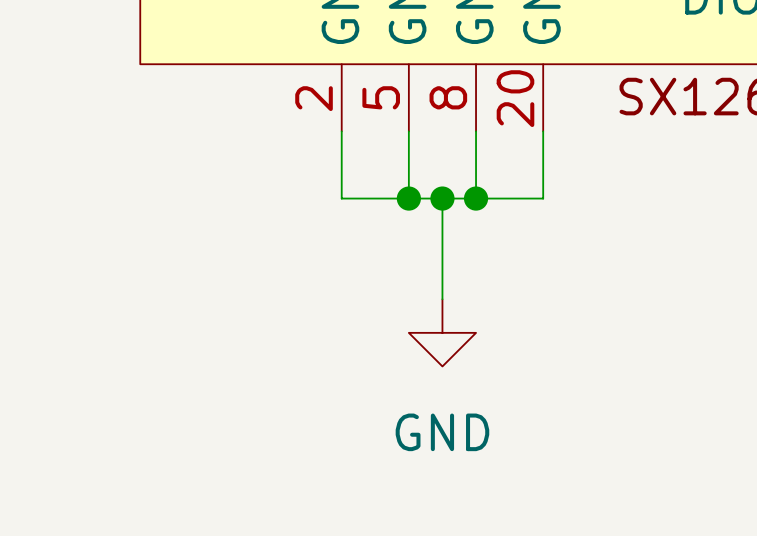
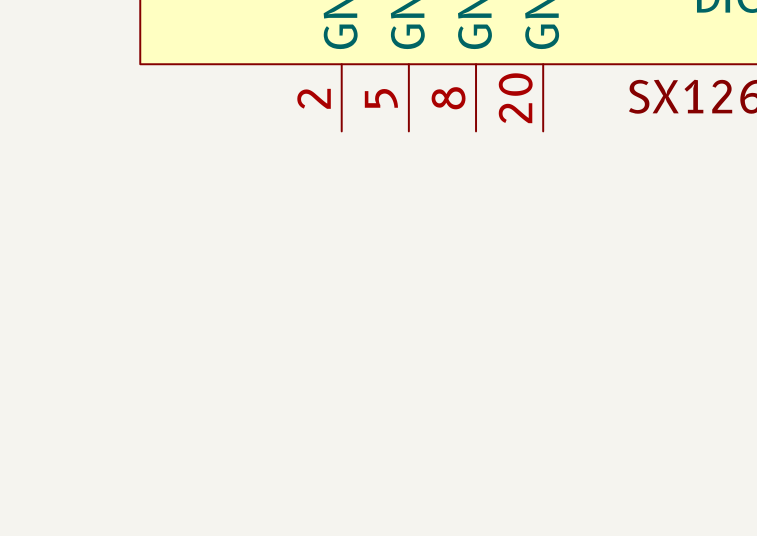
wire: (341, 131) (341, 198) (543, 198) (543, 131) -> none
wire: (408, 131) (408, 198) -> none
wire: (476, 131) (476, 198) -> none
junction: (408, 198) -> none
wire: (442, 198) (442, 299) -> none
junction: (442, 198) -> none
junction: (476, 198) -> none
power symbol: GND (442, 332) -> none

